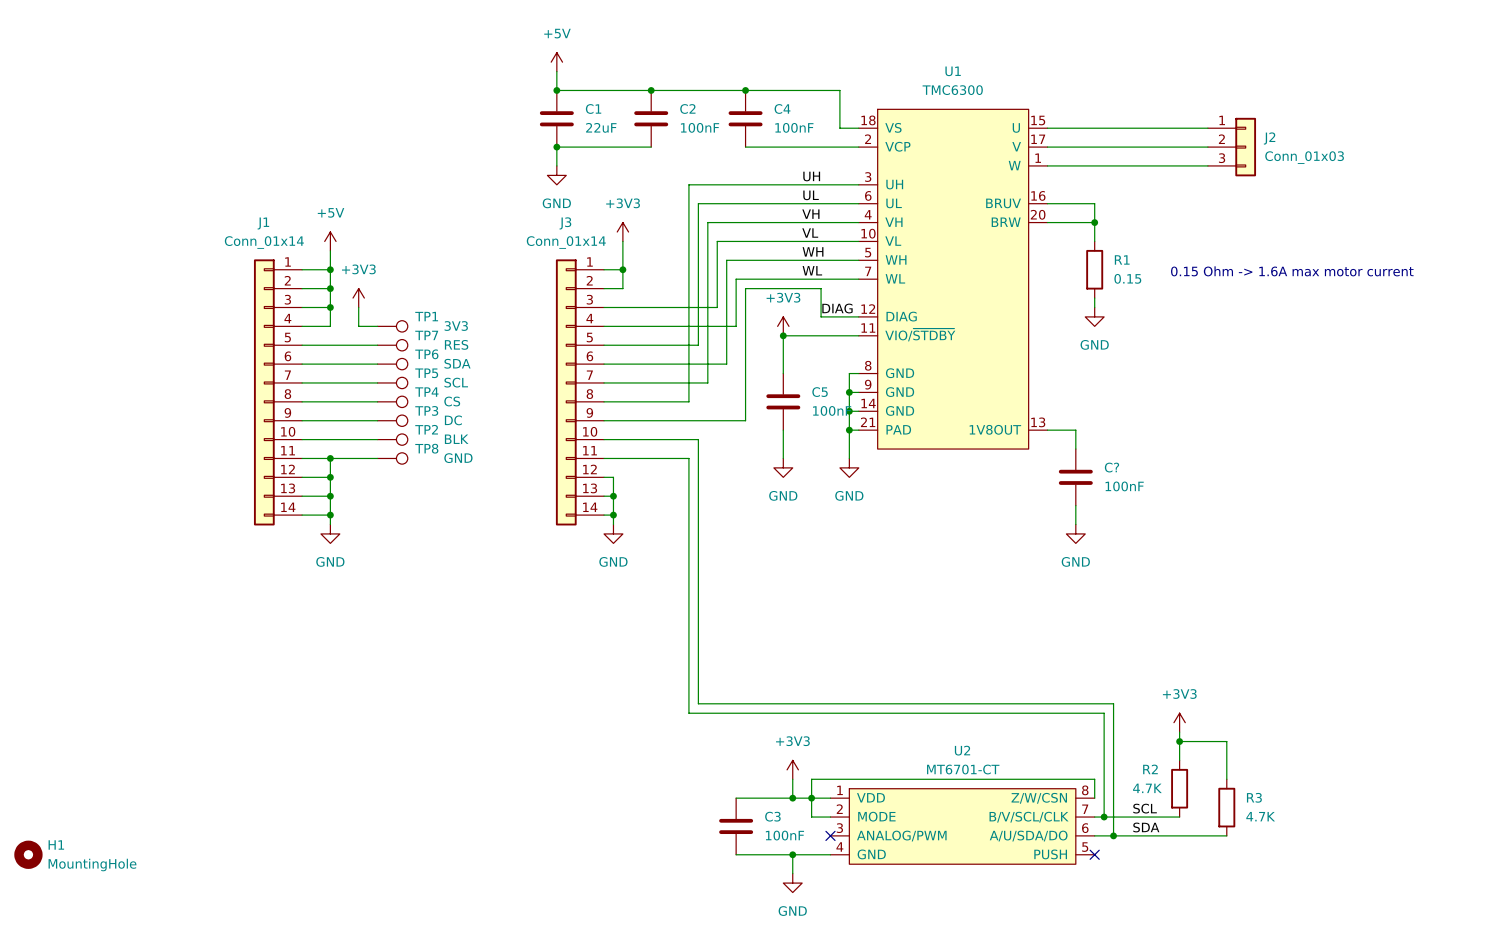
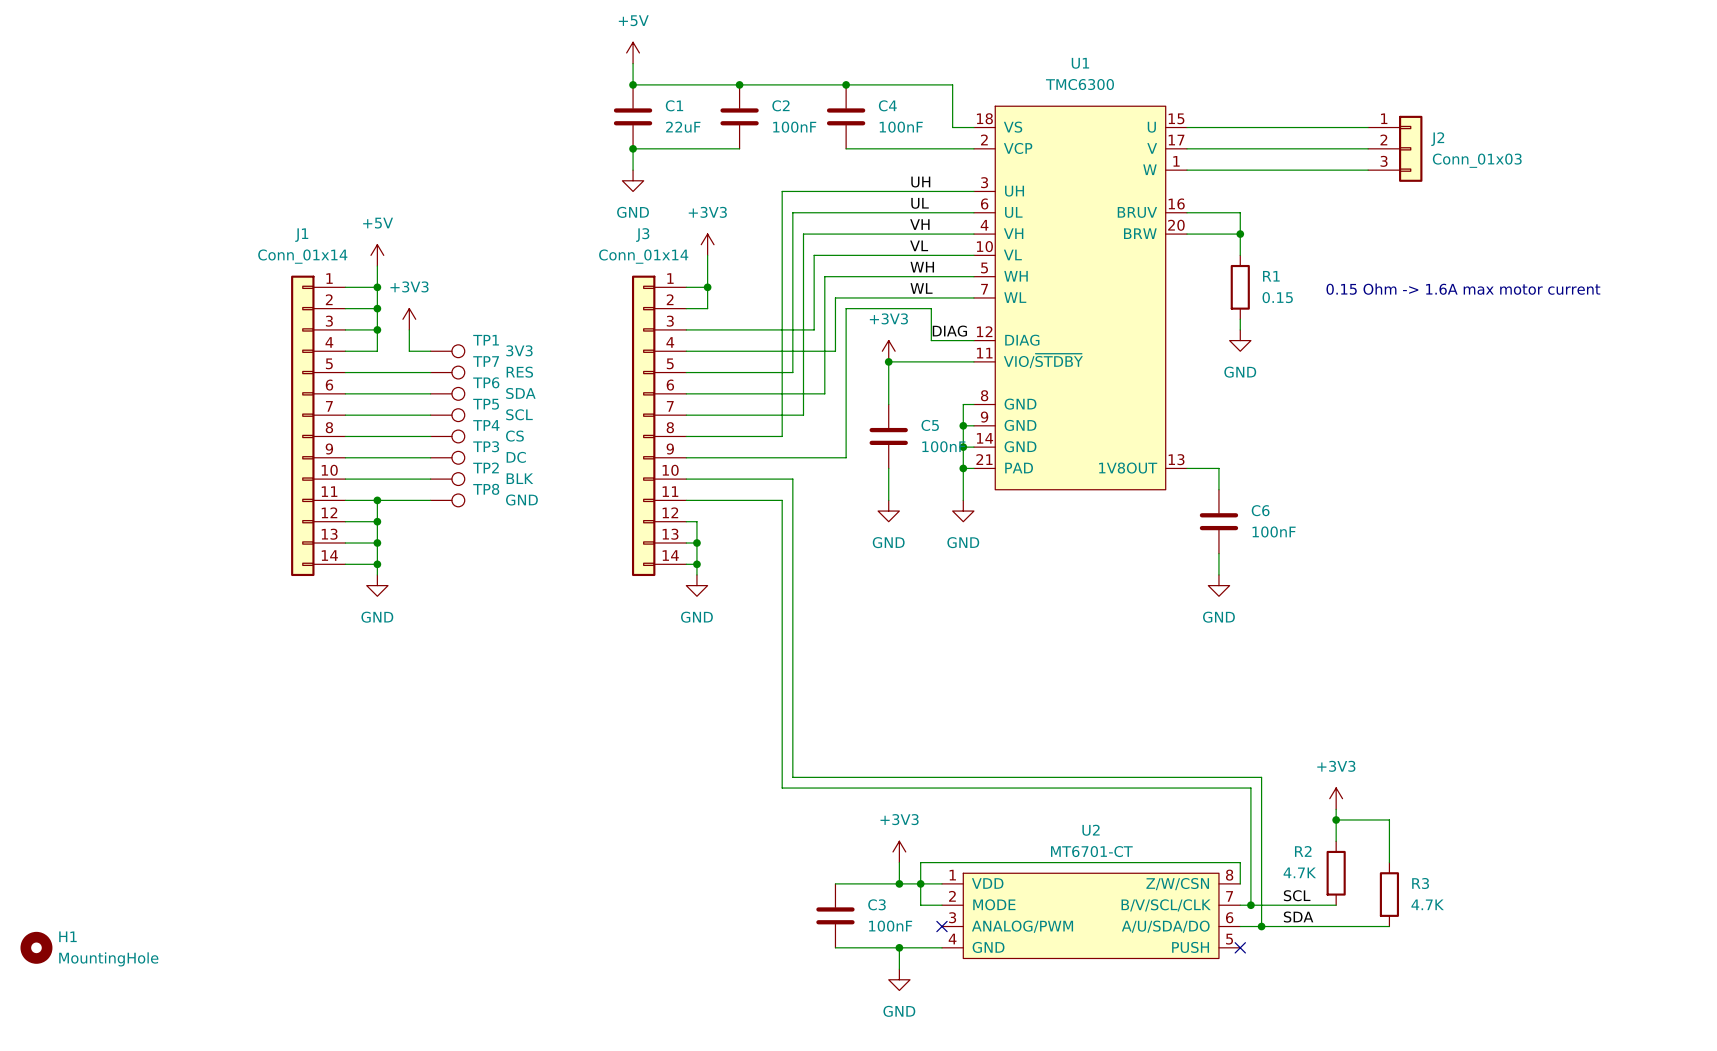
C? name: C? (1111, 467) -> C6 (1260, 510)

